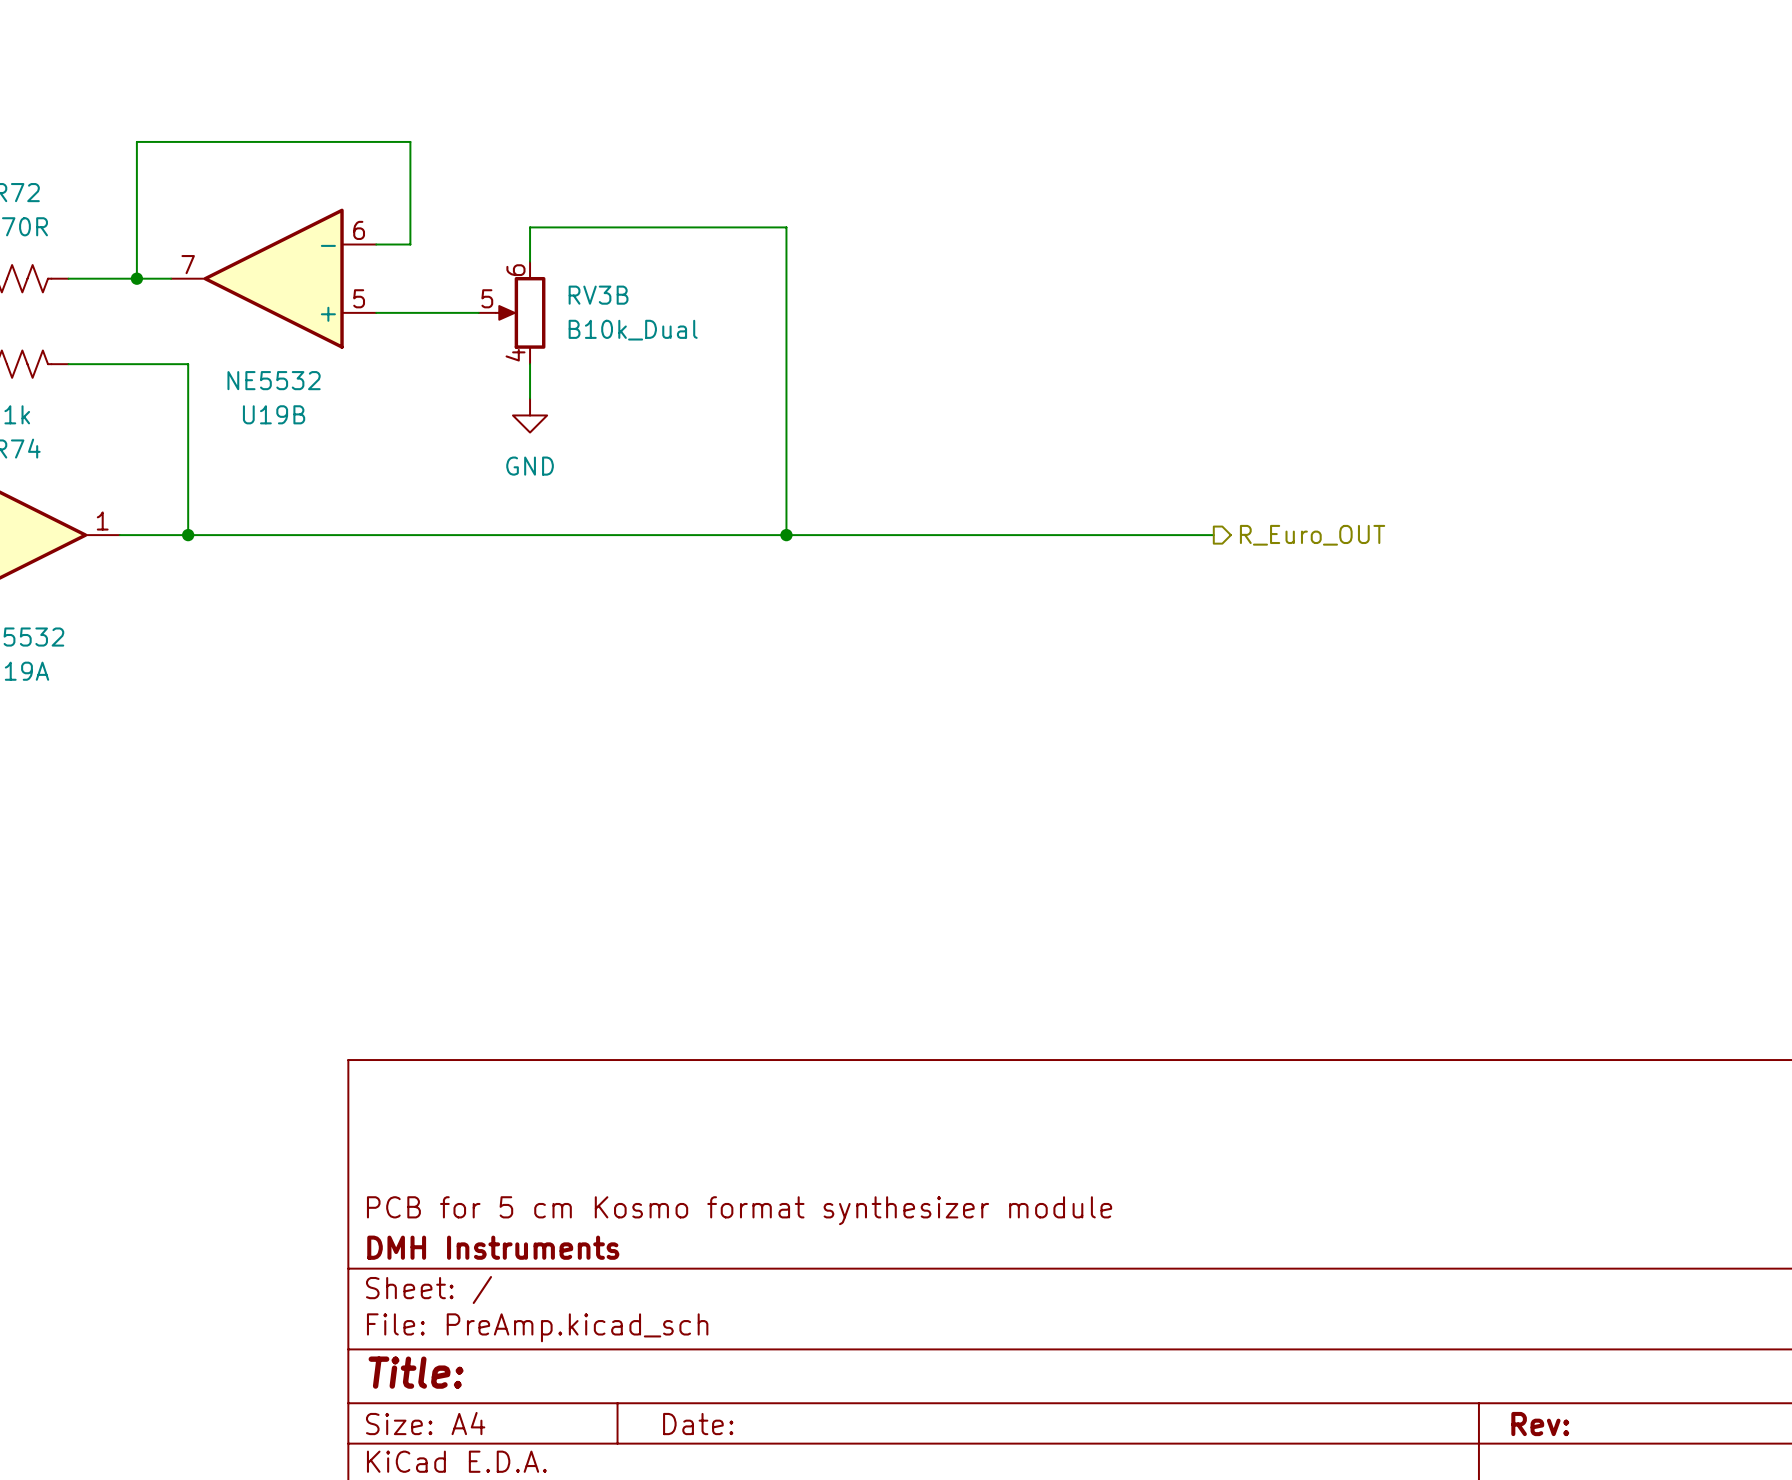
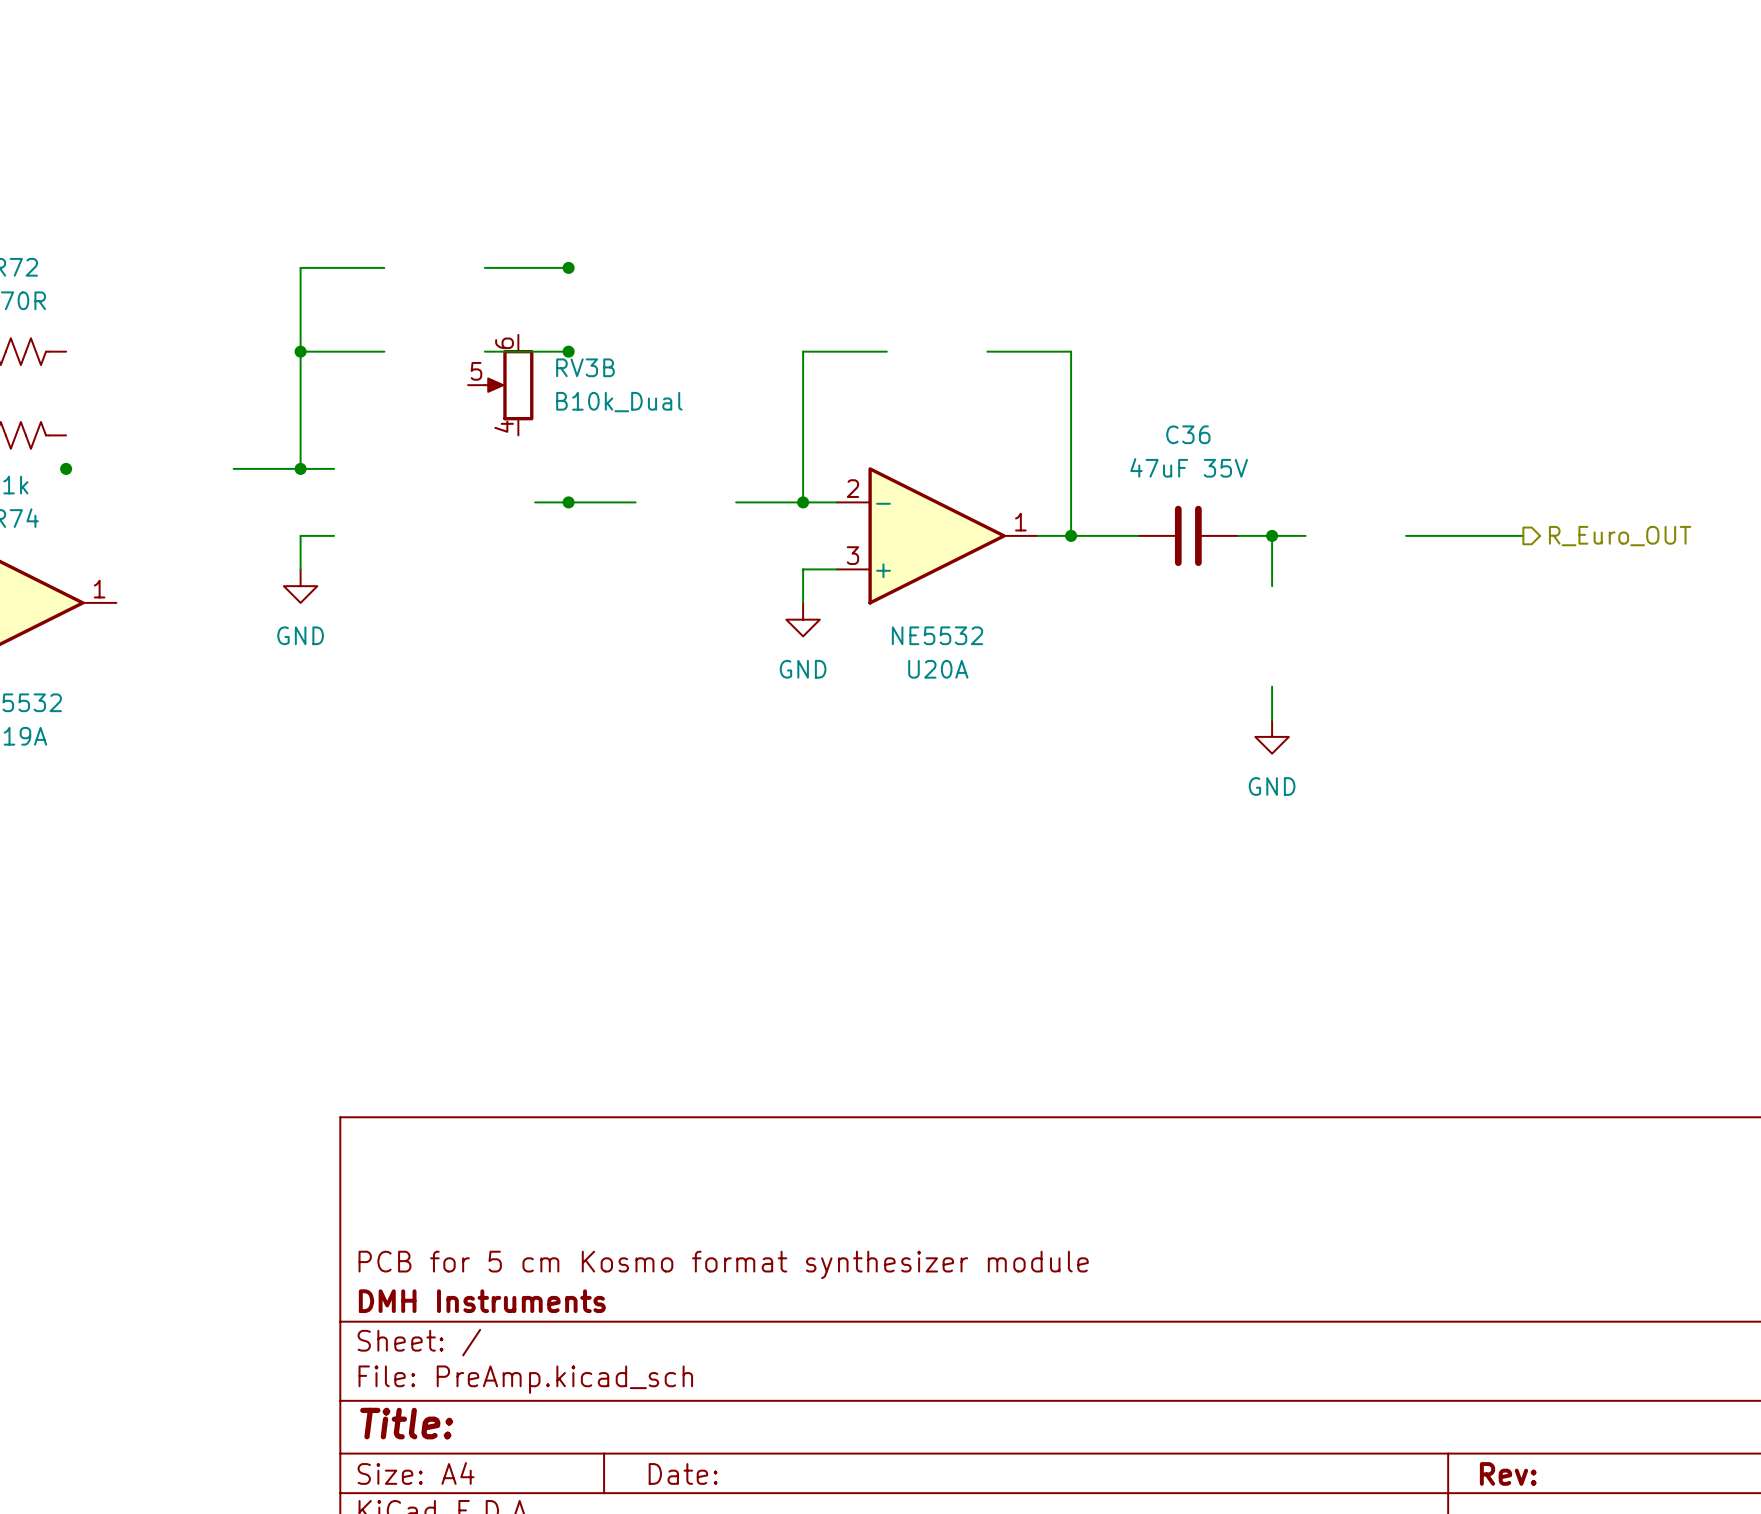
wire: none -> (384, 267) (300, 267) (300, 468)
wire: none -> (484, 267) (568, 267)
junction: none -> (568, 267)
wire: (376, 244) (410, 244) (410, 141) (136, 141) (136, 278) -> none
wire: (530, 261) (530, 227) (786, 227) (786, 535) -> none
wire: (68, 278) (171, 278) -> (233, 468) (334, 468)
junction: (136, 278) -> none
U19B: NE5532 (273, 278) -> none
wire: none -> (300, 351) (384, 351)
junction: none -> (300, 351)
wire: none -> (484, 351) (568, 351)
junction: none -> (568, 351)
wire: none -> (886, 351) (803, 351) (803, 502)
wire: none -> (987, 351) (1071, 351) (1071, 535)
wire: (376, 312) (478, 312) -> (535, 502) (635, 502)
wire: (68, 364) (188, 364) (188, 535) -> none
wire: (530, 364) (530, 398) -> none
junction: none -> (66, 468)
junction: none -> (300, 468)
power symbol: GND (530, 415) -> none
junction: none -> (568, 502)
wire: none -> (736, 502) (836, 502)
junction: none -> (803, 502)
wire: none -> (334, 535) (300, 535) (300, 569)
U20A: none -> NE5532 (937, 535)
wire: none -> (1037, 535) (1138, 535)
junction: none -> (1071, 535)
C36: none -> 47uF 35V (1188, 535)
wire: none -> (1238, 535) (1305, 535)
wire: none -> (1272, 535) (1272, 586)
junction: none -> (1272, 535)
wire: none -> (1406, 535) (1523, 535)
hierarchical label: none -> R_Euro_OUT (1620, 536)
wire: none -> (836, 569) (803, 569) (803, 602)
power symbol: none -> GND (300, 586)
wire: (119, 535) (1213, 535) -> none
junction: (188, 535) -> none
junction: (786, 535) -> none
hierarchical label: R_Euro_OUT (1312, 535) -> none
power symbol: none -> GND (803, 619)
wire: none -> (1272, 686) (1272, 720)
power symbol: none -> GND (1272, 736)

